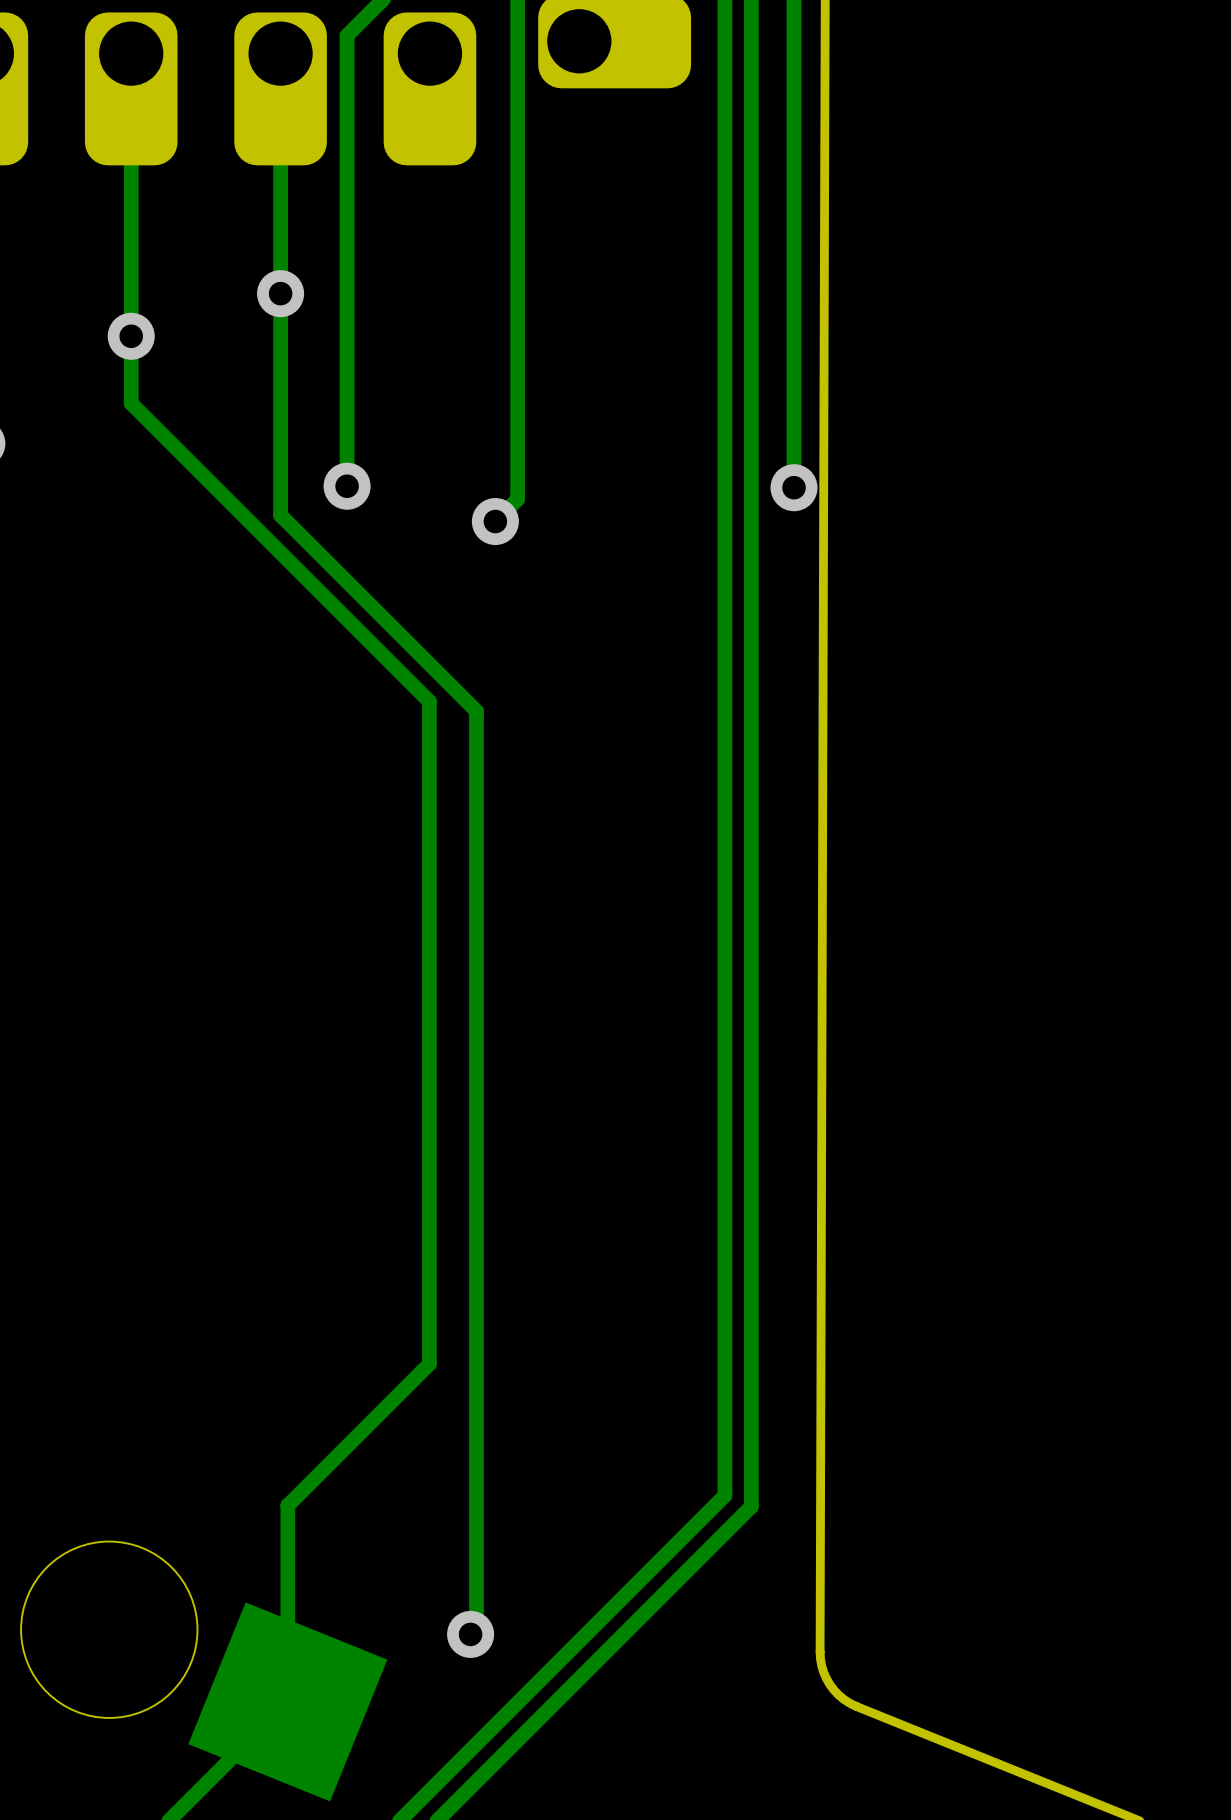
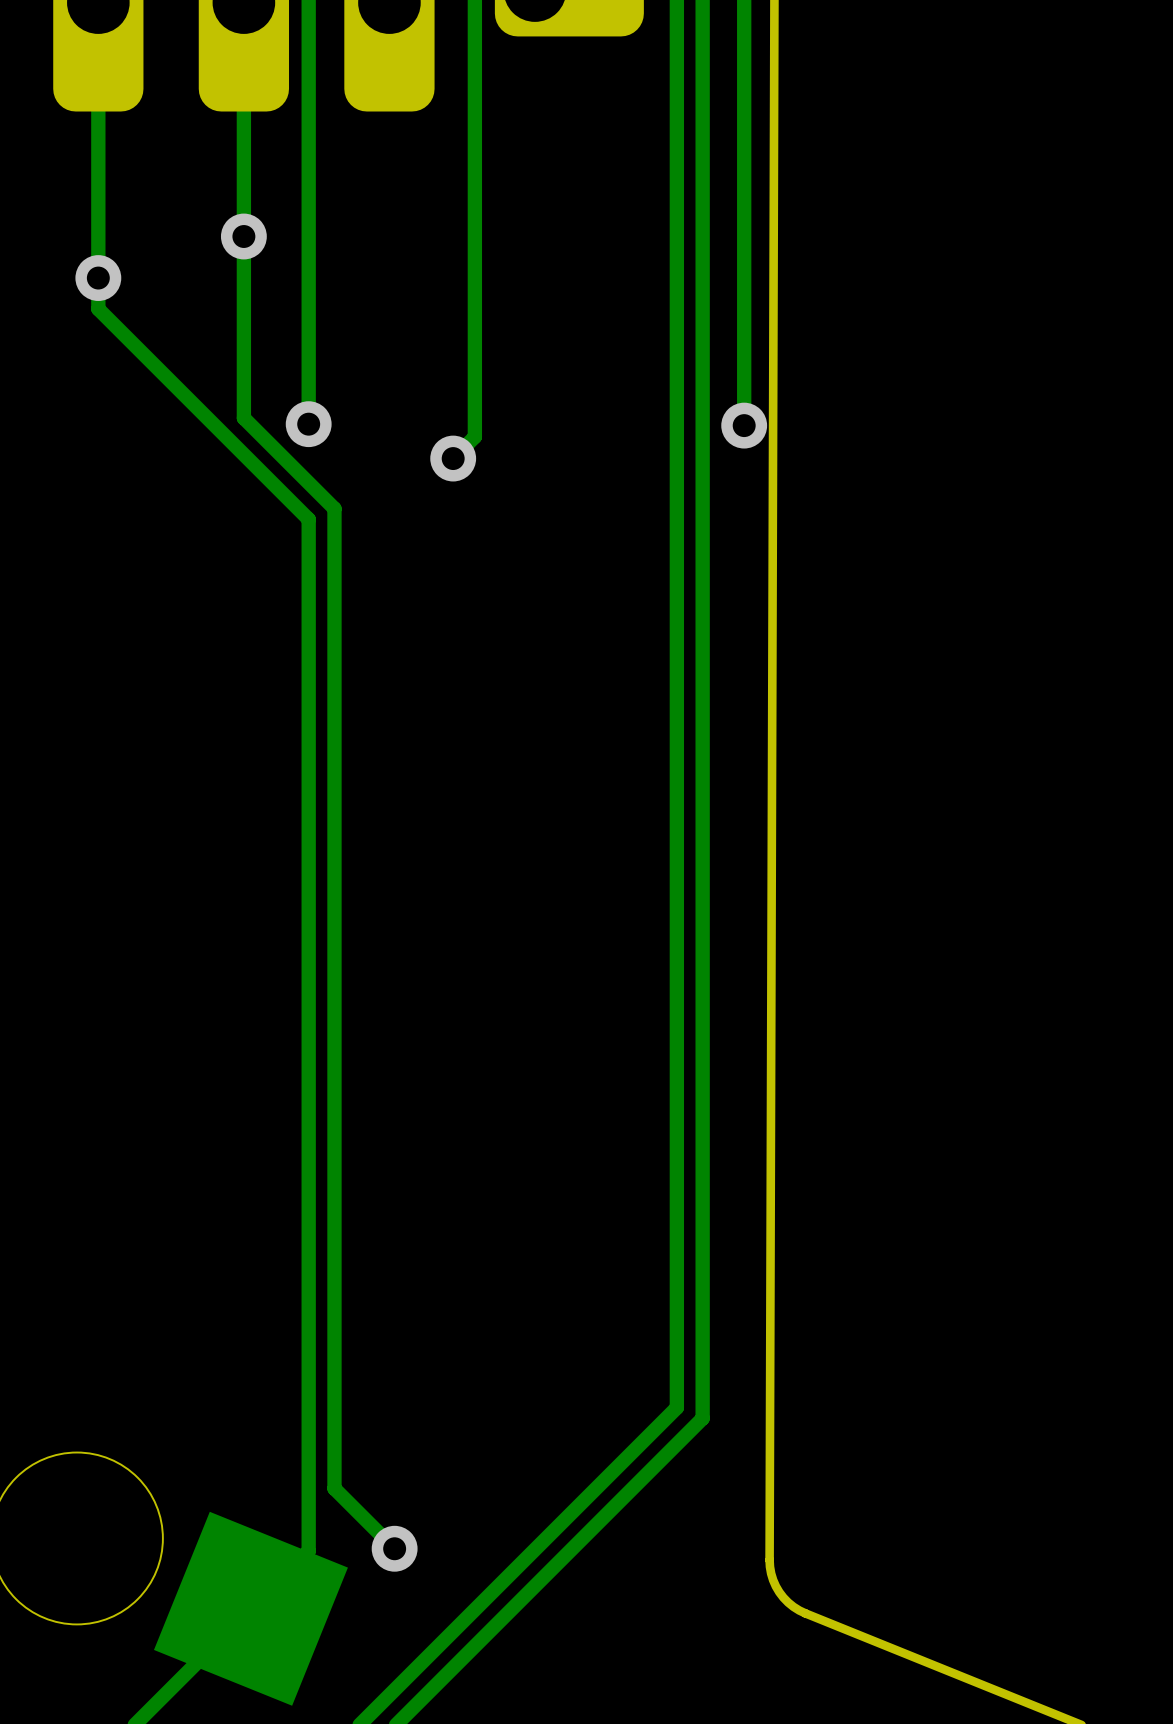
track: (131, 368) (131, 403) (429, 701) (429, 1363) (287, 1505) (287, 1701) -> (98, 309) (308, 519) (308, 1551) (250, 1608)
track: (280, 480) (280, 515) (476, 711) (476, 1628) (470, 1634) -> (243, 418) (334, 508) (334, 1488) (394, 1548)
via position: (470, 1634) -> (394, 1548)

